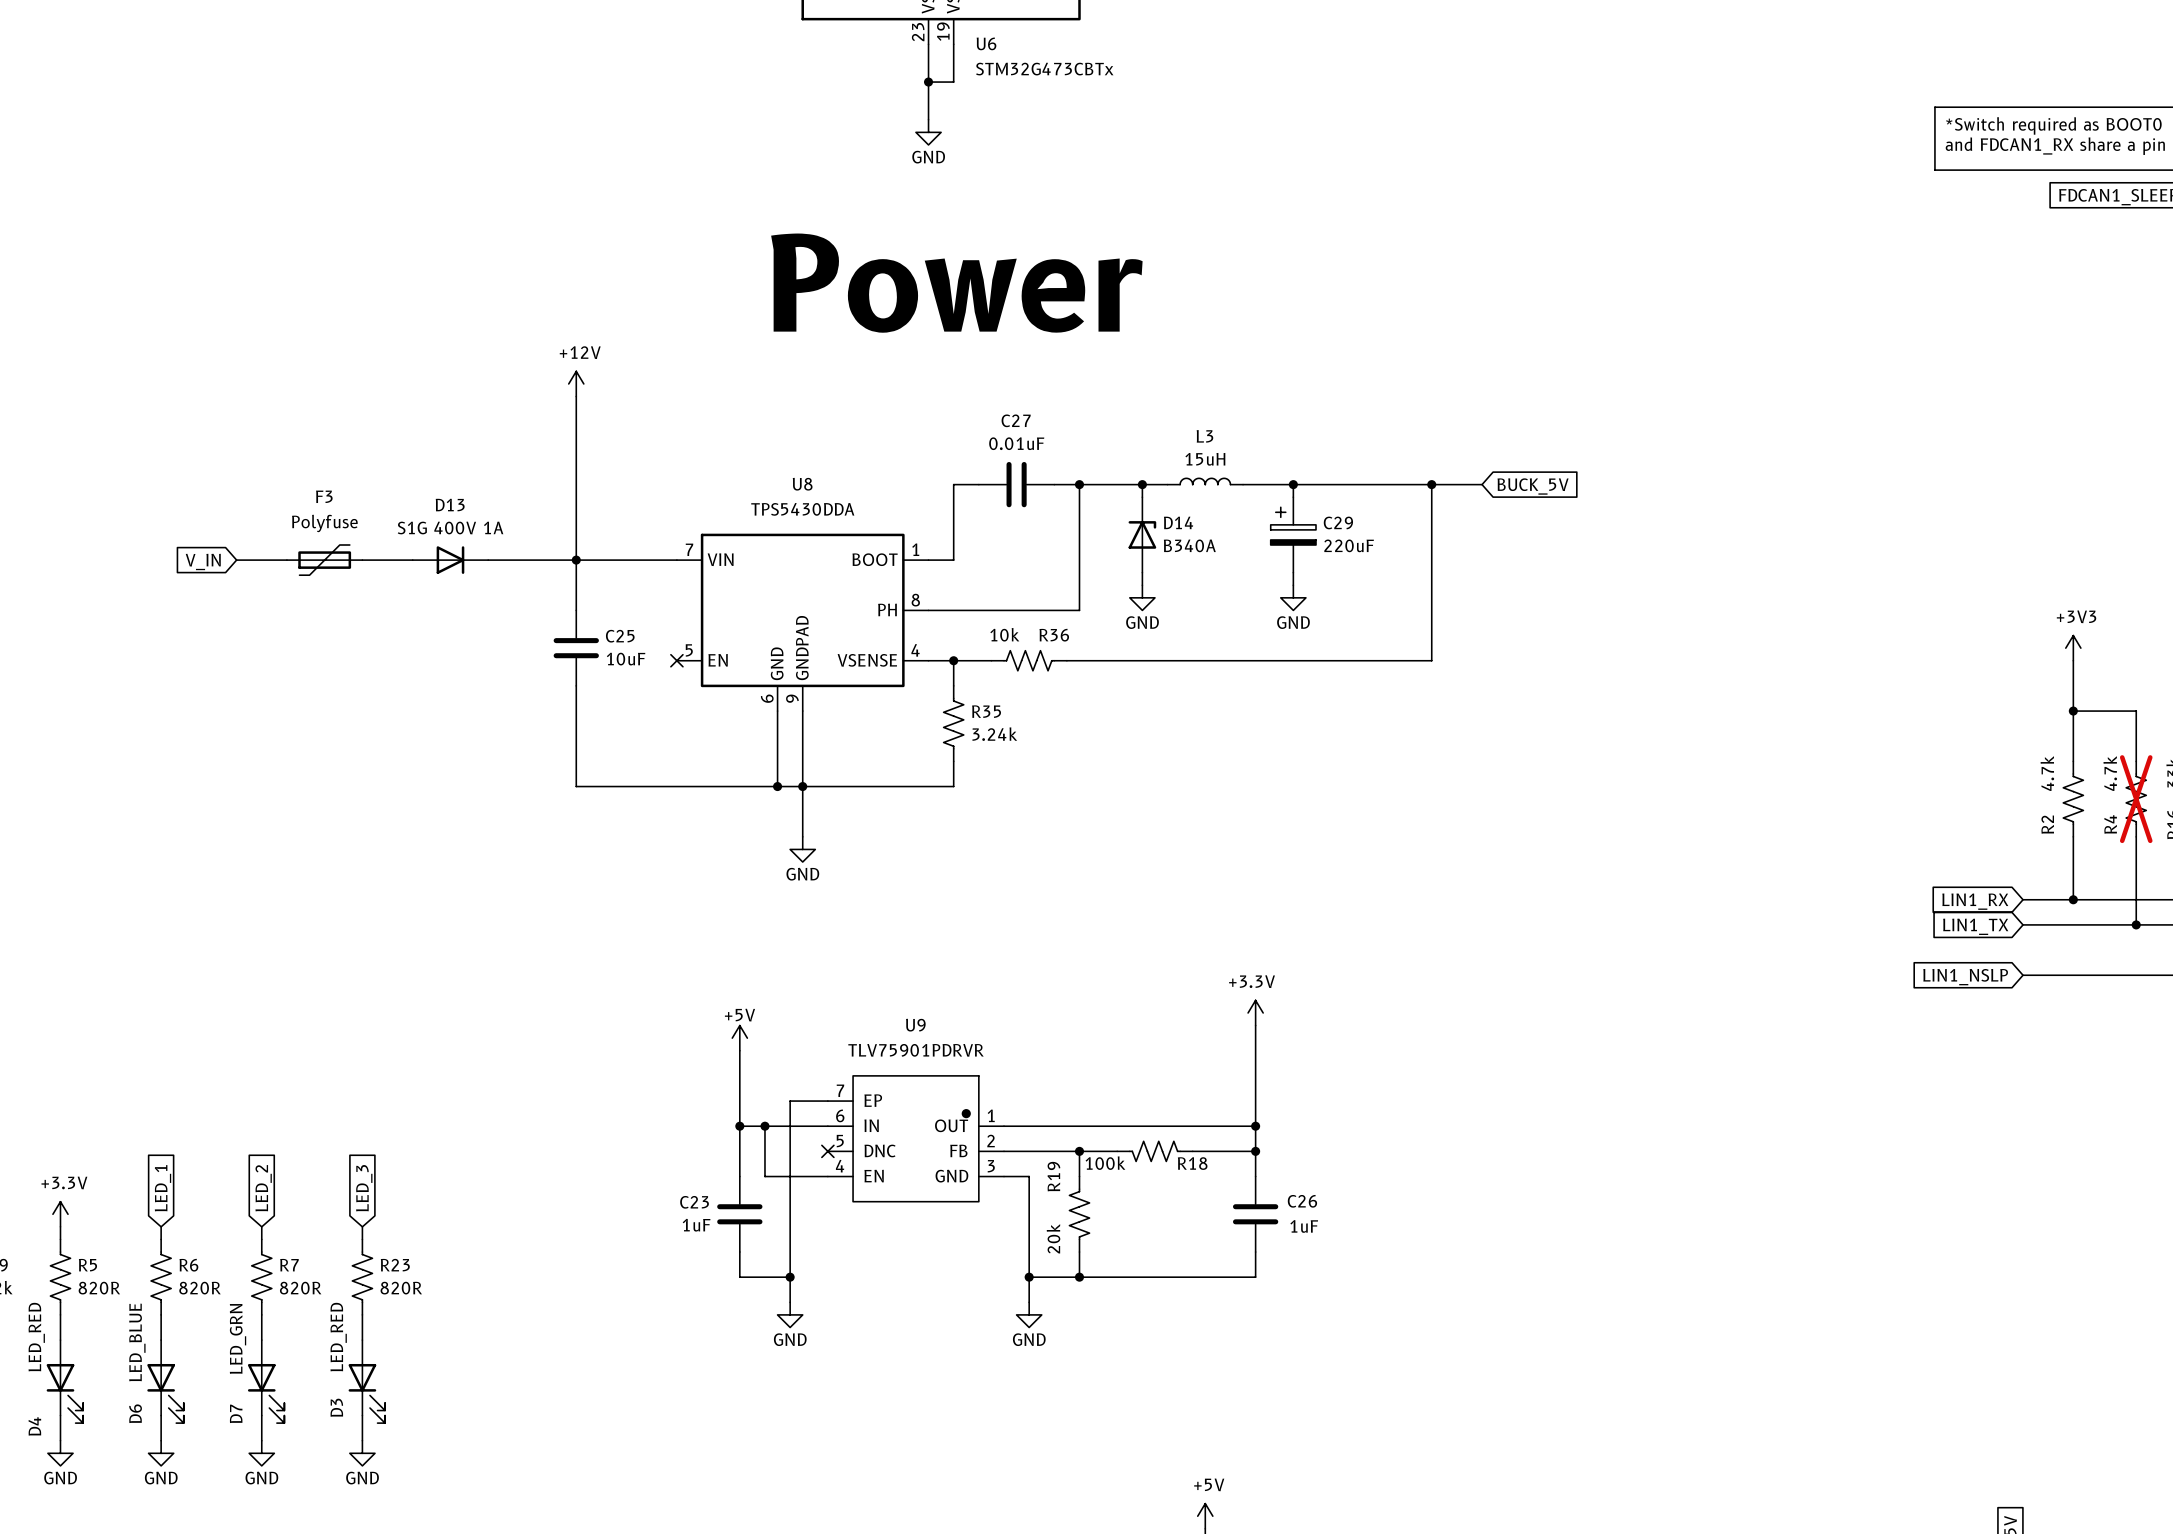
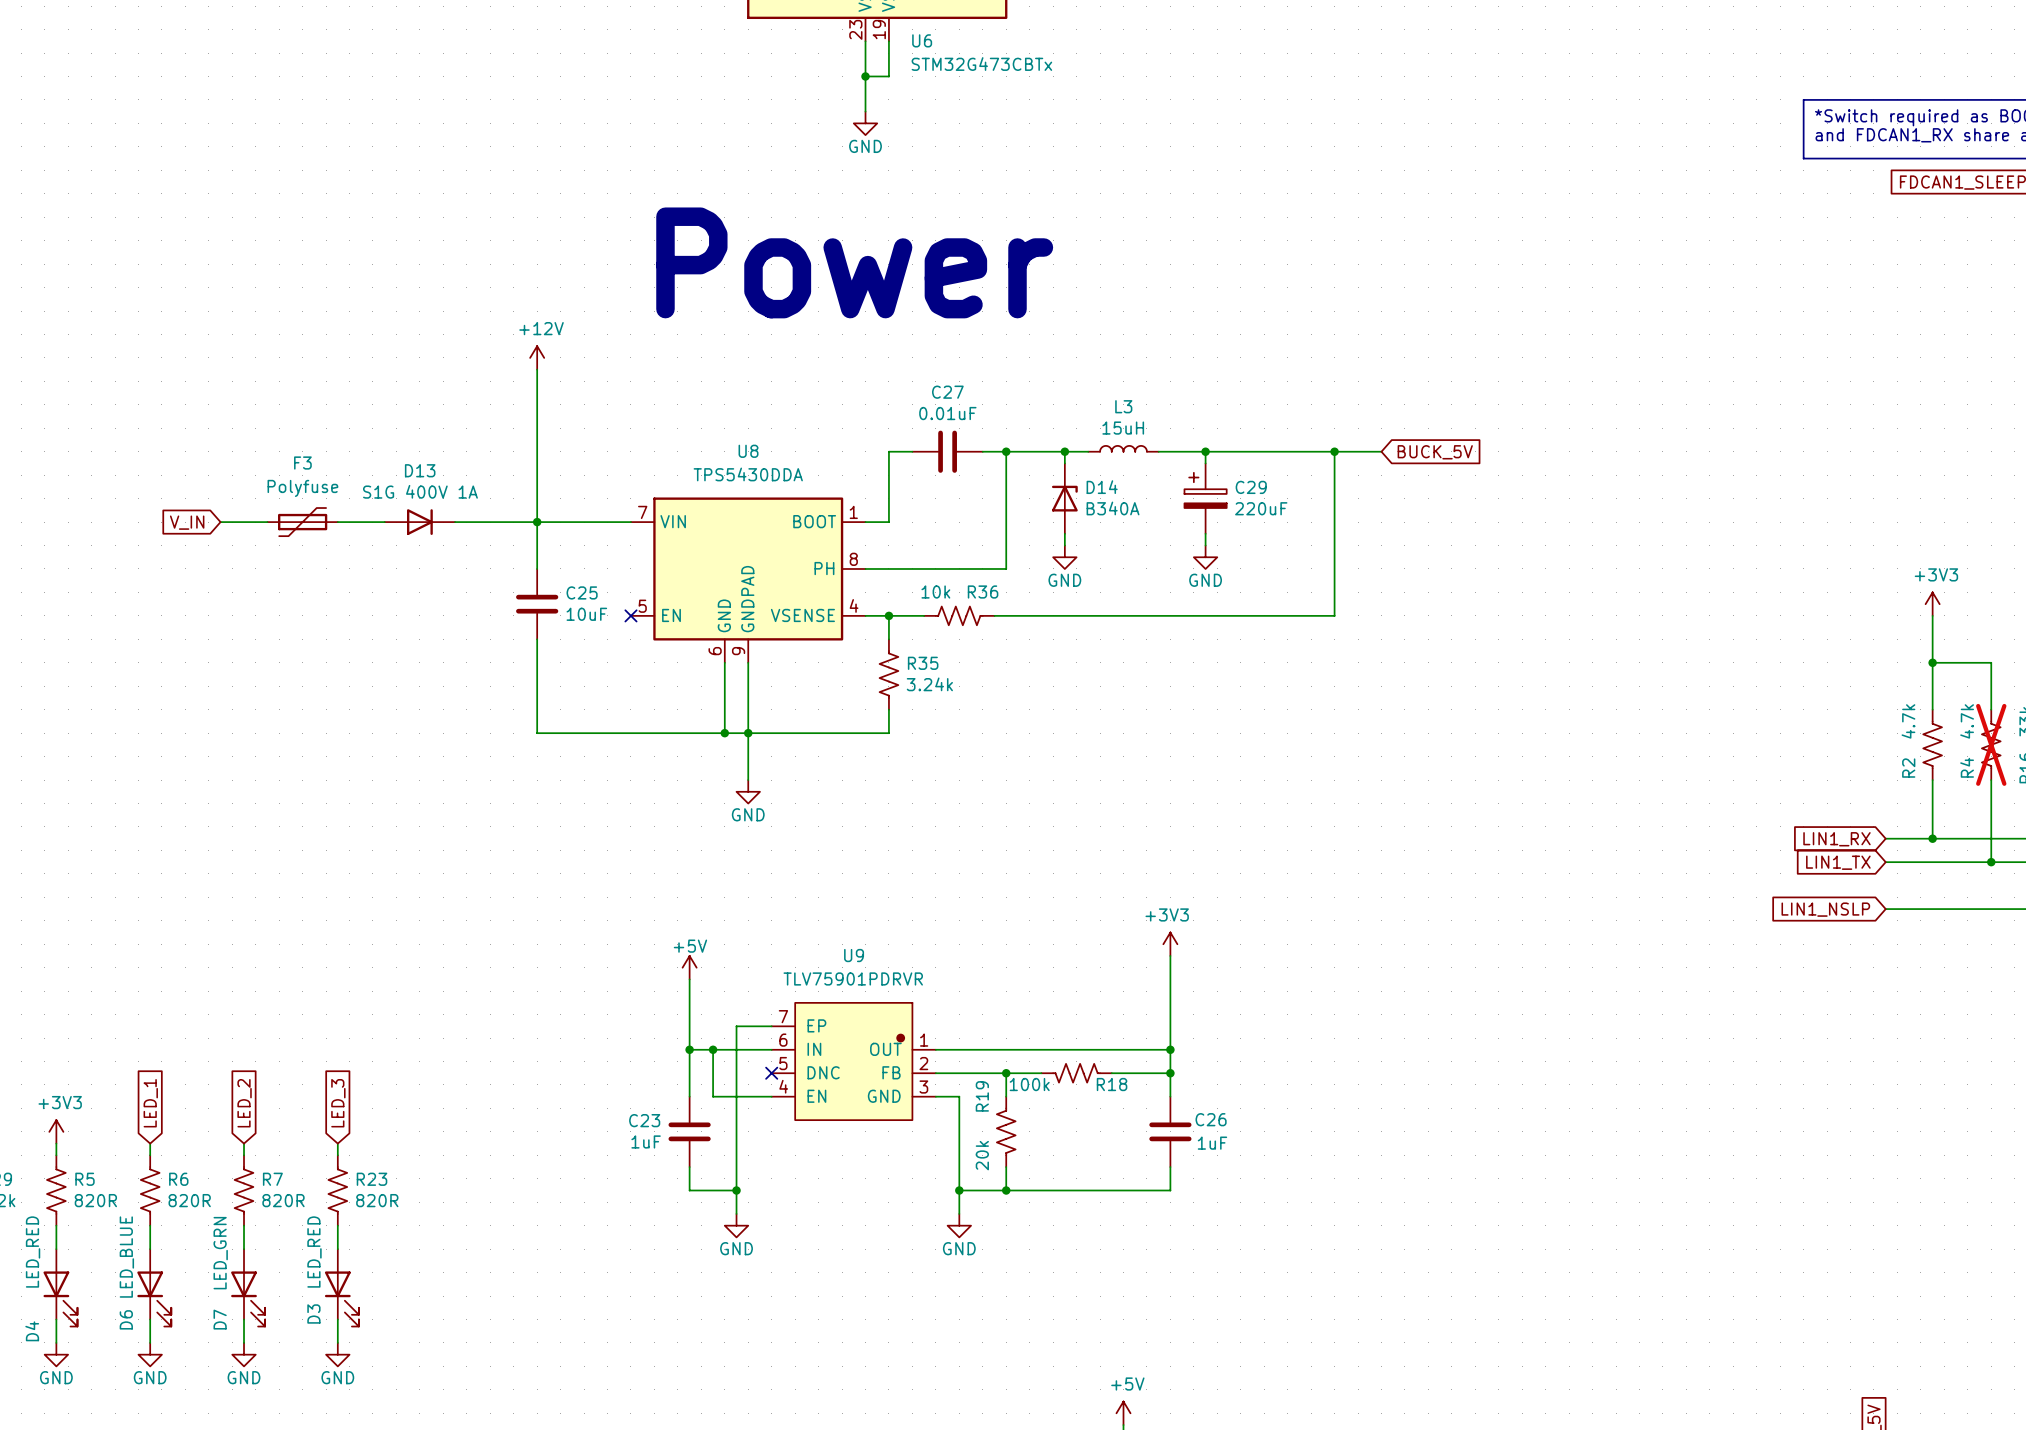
power symbol: +3.3V (1255, 1012) -> +3V3 (1170, 944)
power symbol: +3.3V (60, 1214) -> +3V3 (56, 1131)

